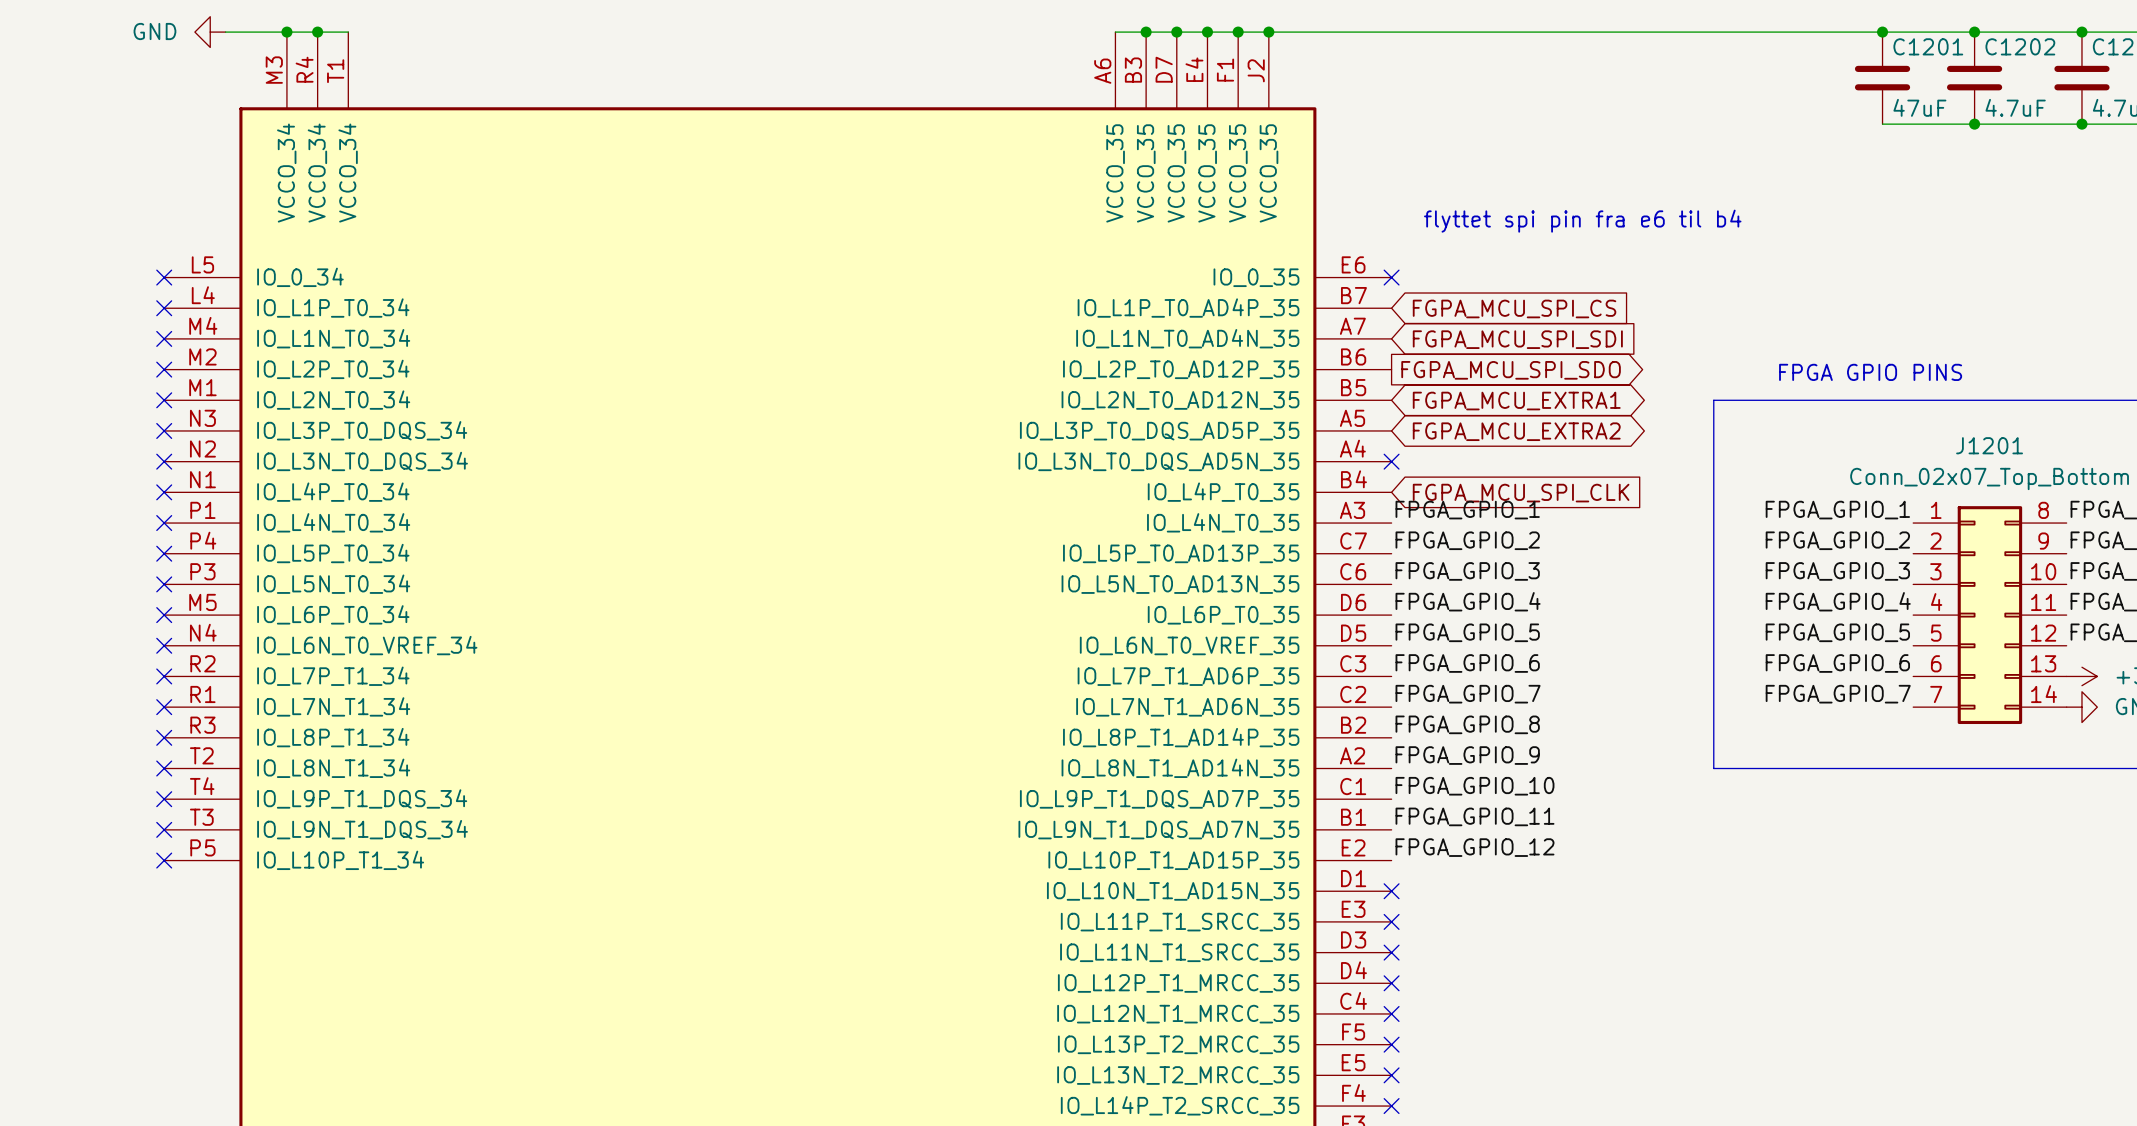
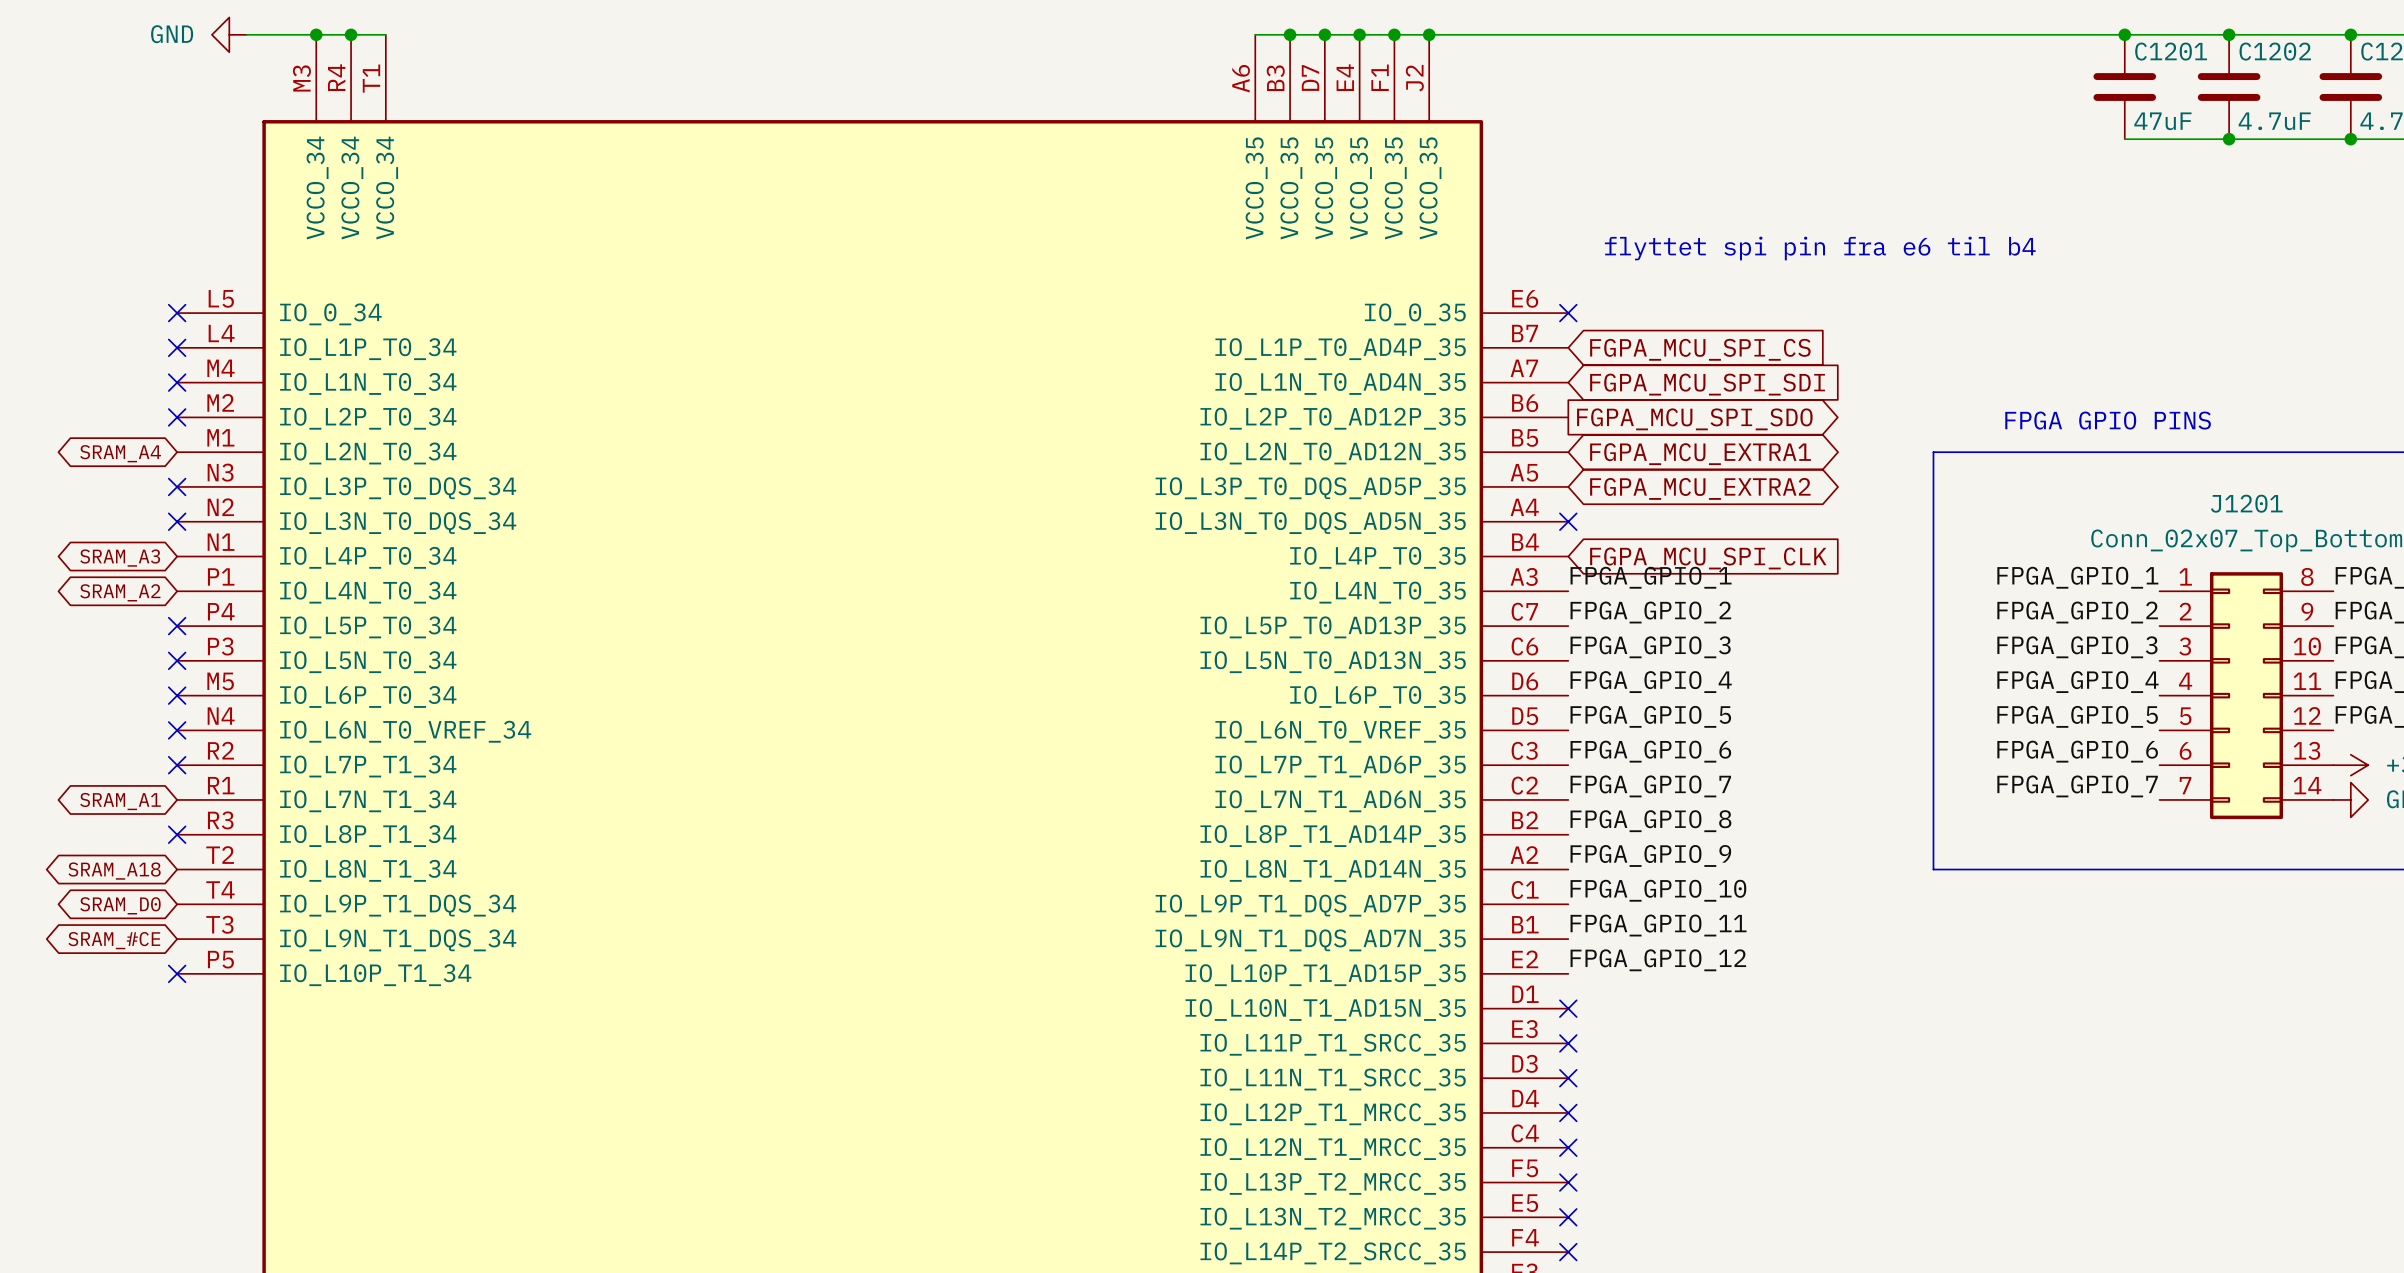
global label: none -> SRAM_A4 (120, 453)
no-connect mark: (164, 400) -> none
global label: none -> SRAM_A3 (120, 558)
no-connect mark: (164, 492) -> none
global label: none -> SRAM_A2 (120, 592)
no-connect mark: (164, 523) -> none
global label: none -> SRAM_A1 (120, 801)
no-connect mark: (164, 707) -> none
no-connect mark: (164, 768) -> none
global label: none -> SRAM_A18 (114, 871)
global label: none -> SRAM_D0 (120, 905)
no-connect mark: (164, 799) -> none
no-connect mark: (164, 829) -> none
global label: none -> SRAM_#CE (114, 940)

